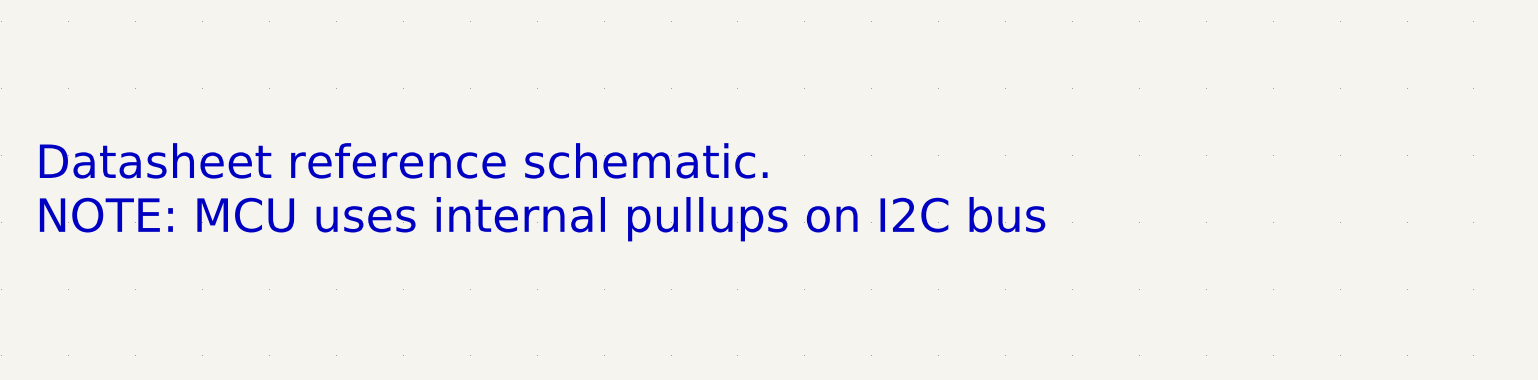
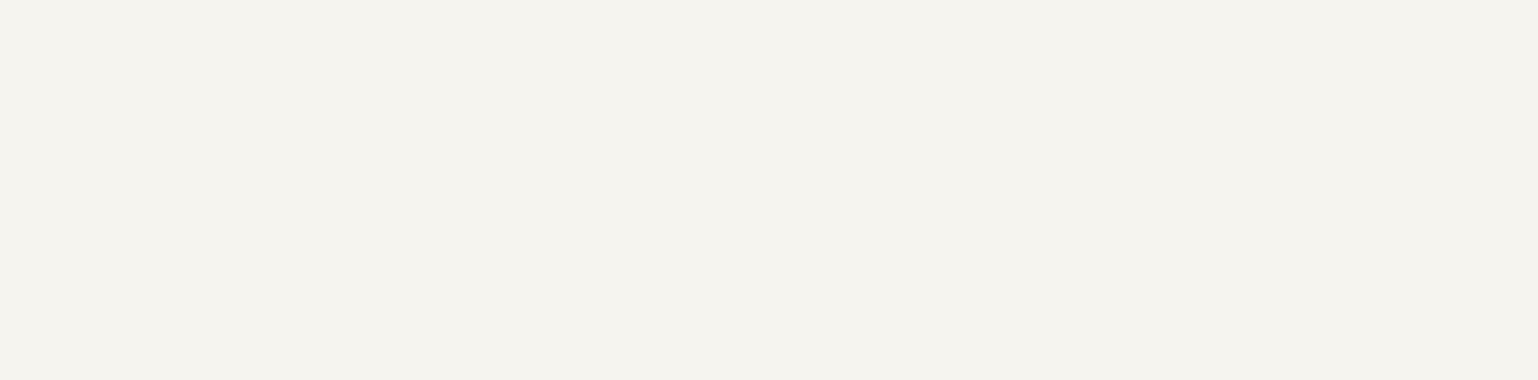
text: Datasheet reference schematic. (403, 160) -> none
text: NOTE: MCU uses internal pullups on I2C bus (542, 219) -> none

